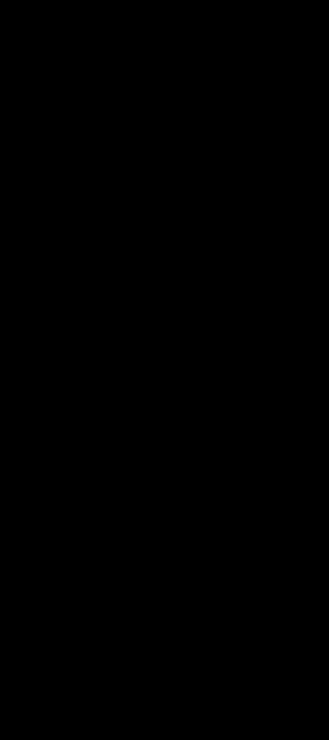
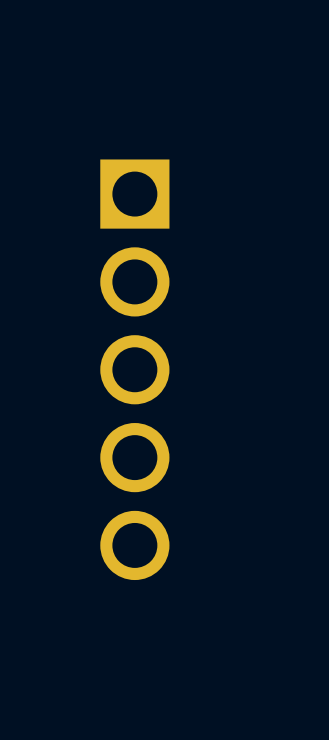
part: none -> (134, 369)

